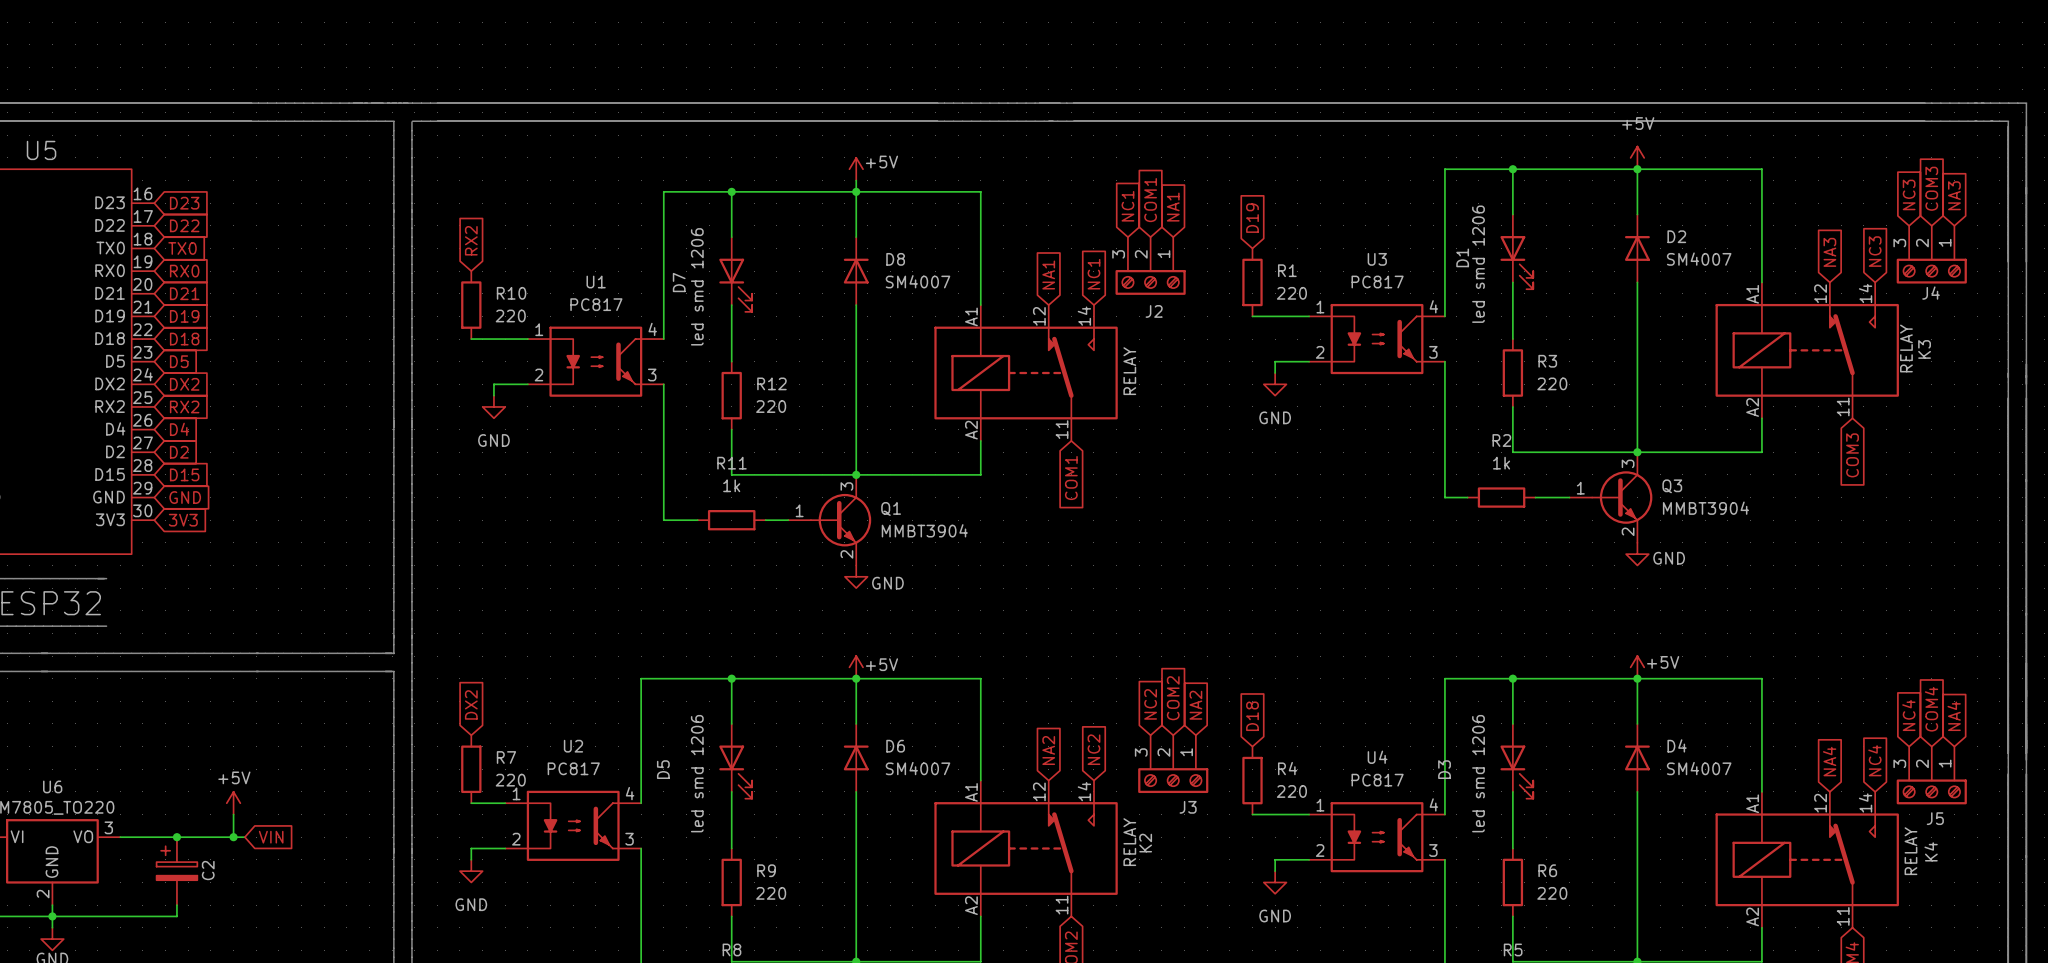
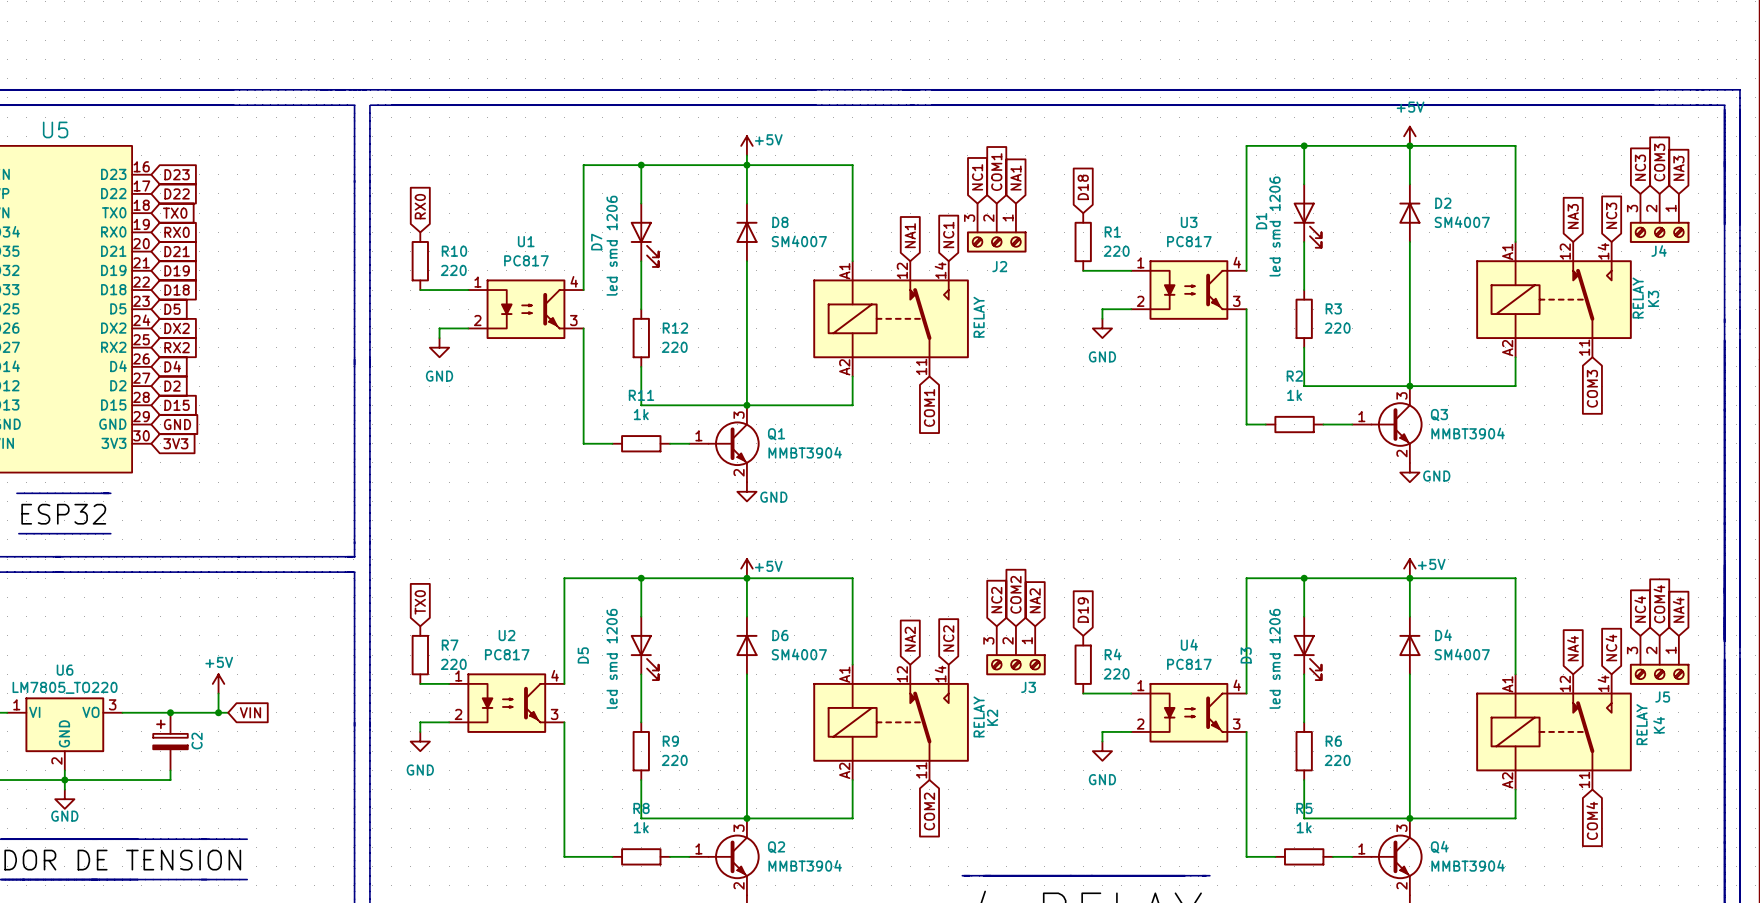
global label: D19 (1252, 218) -> D18 (1083, 187)
global label: RX2 (471, 240) -> RX0 (420, 206)
global label: DX2 (471, 704) -> TX0 (420, 602)
global label: D18 (1252, 716) -> D19 (1083, 610)

